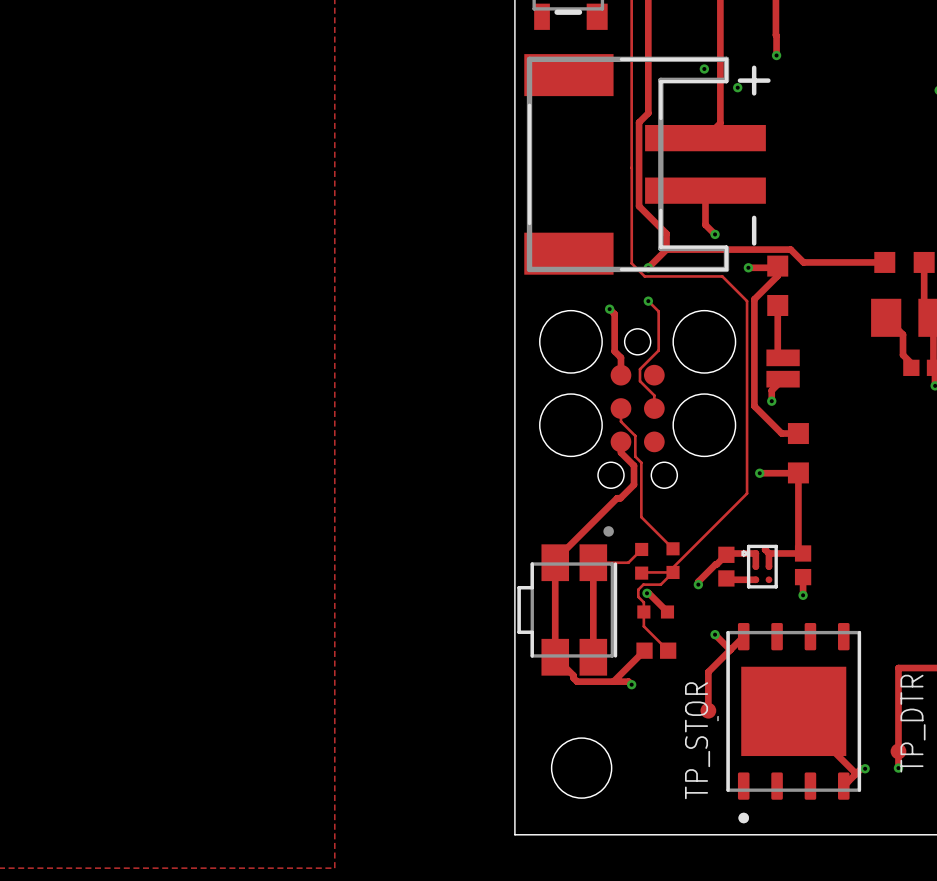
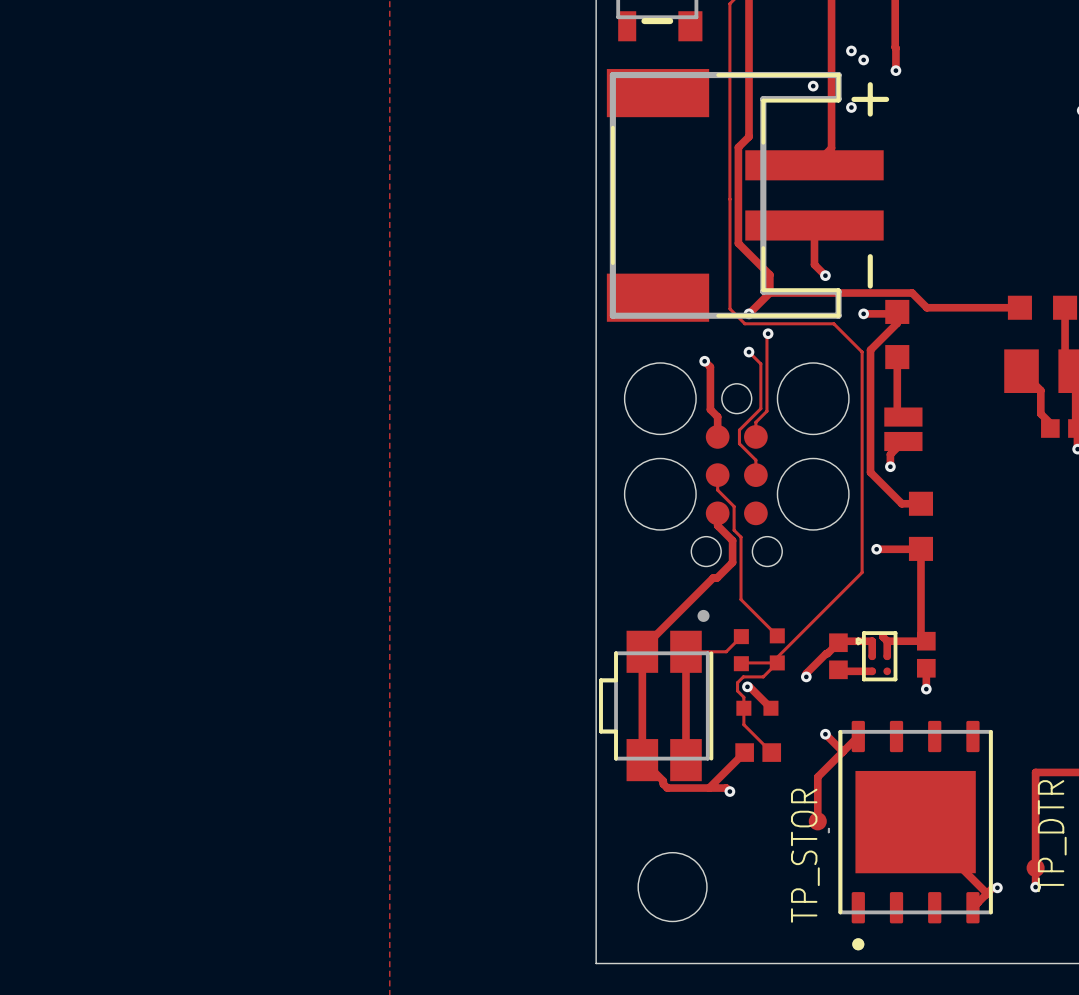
via: none -> (851, 50)
via: none -> (863, 59)
track: none -> (768, 333) (766, 411) (755, 422) (755, 436)
via: none -> (768, 333)

